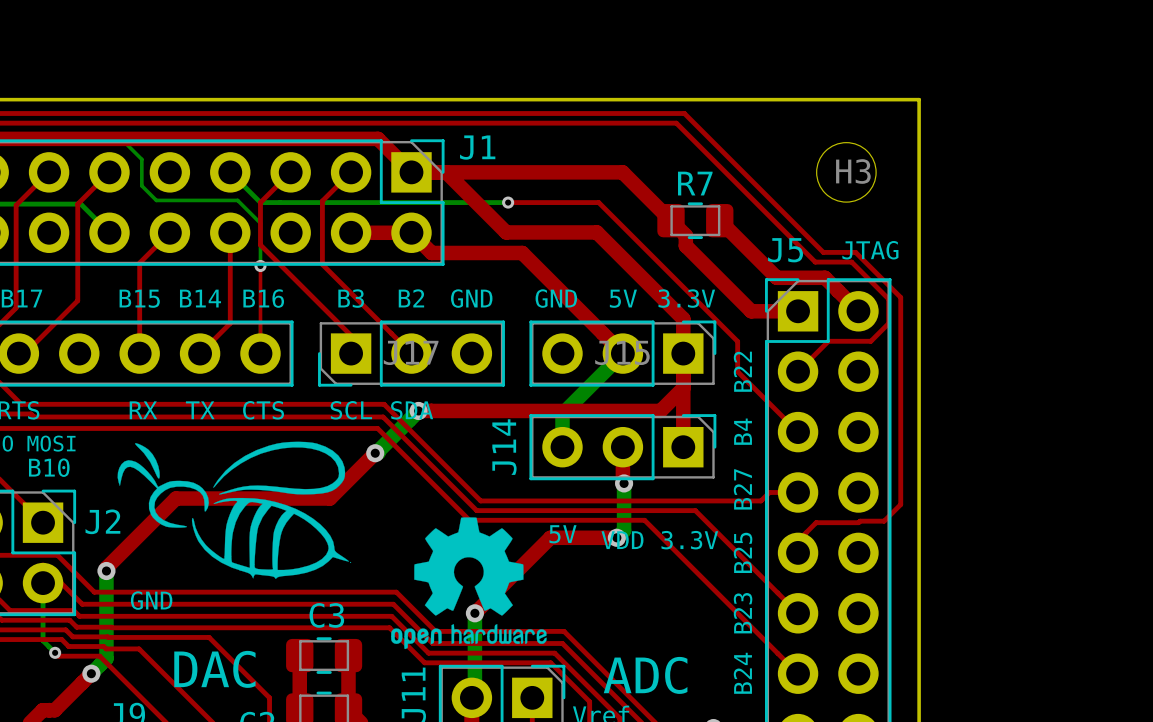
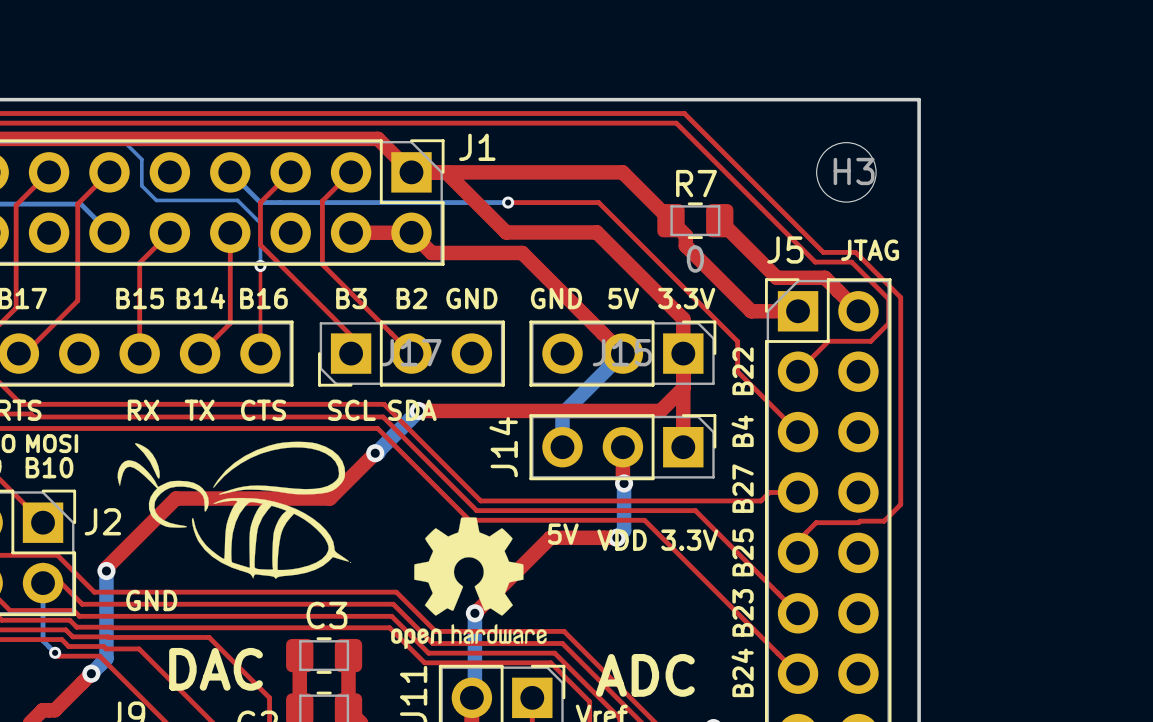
R7 value: none -> 0 (695, 259)

